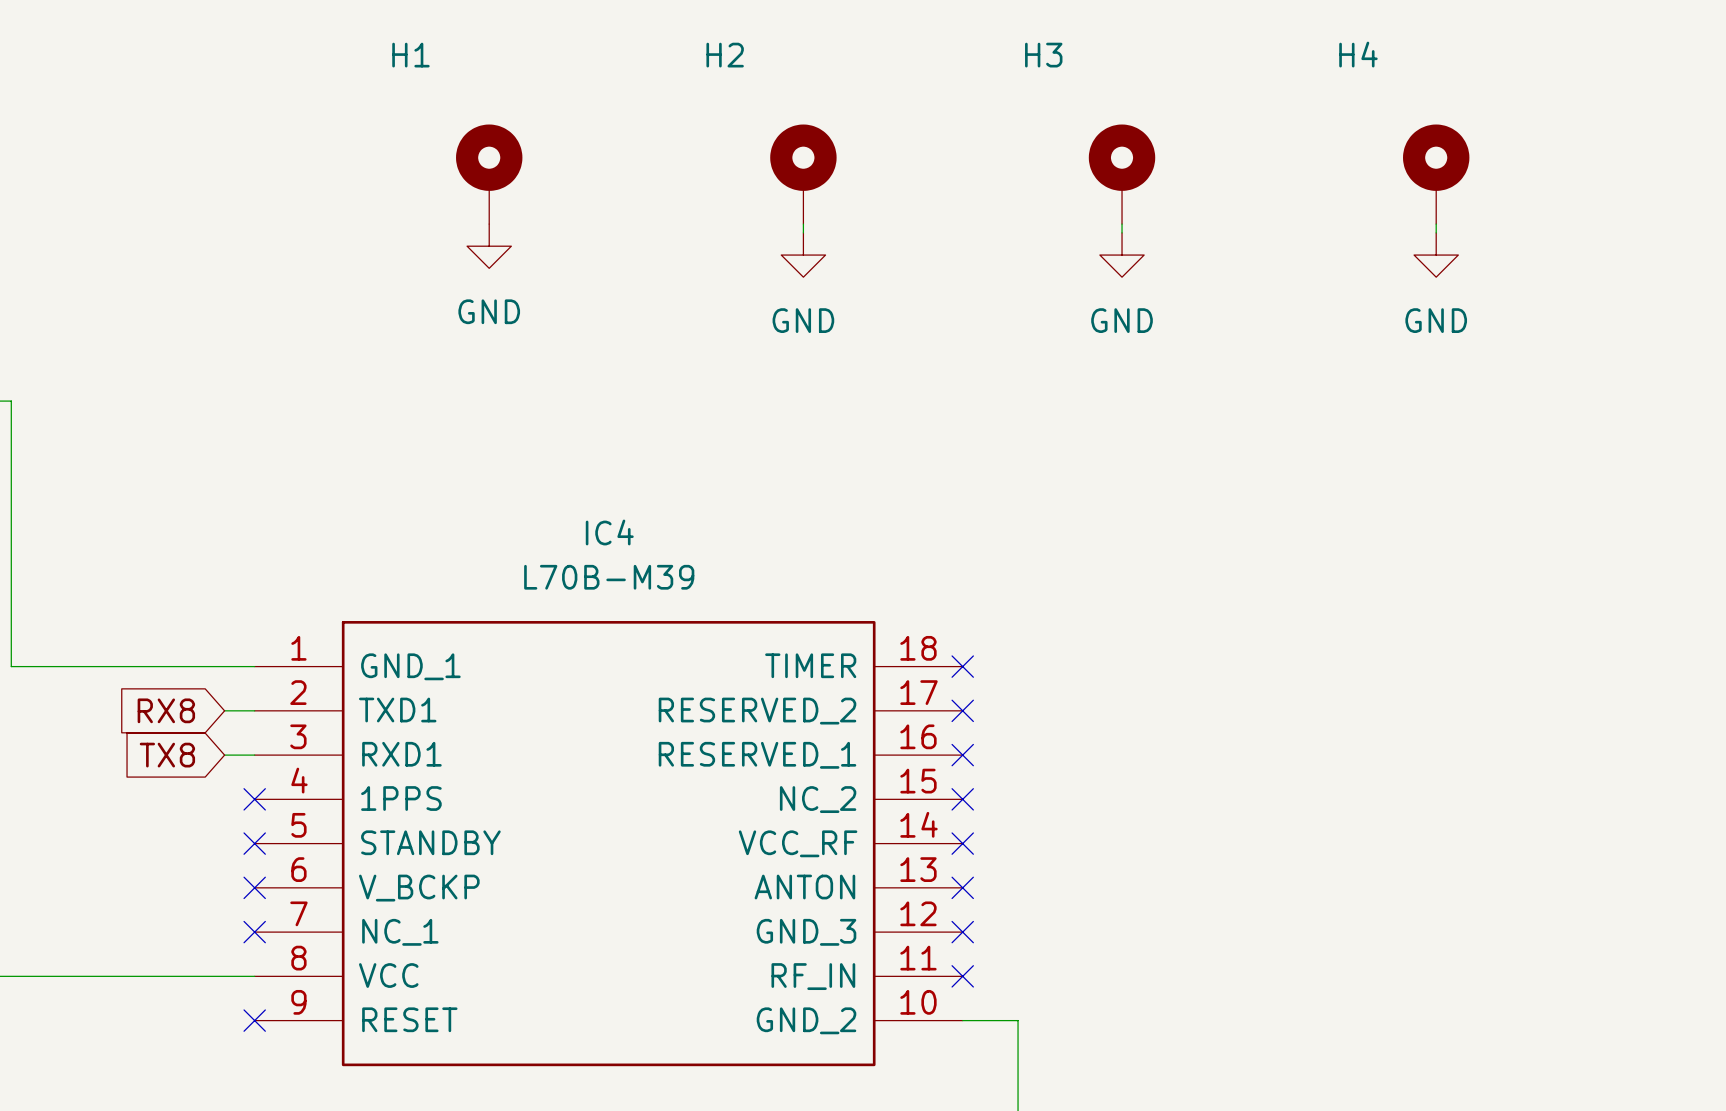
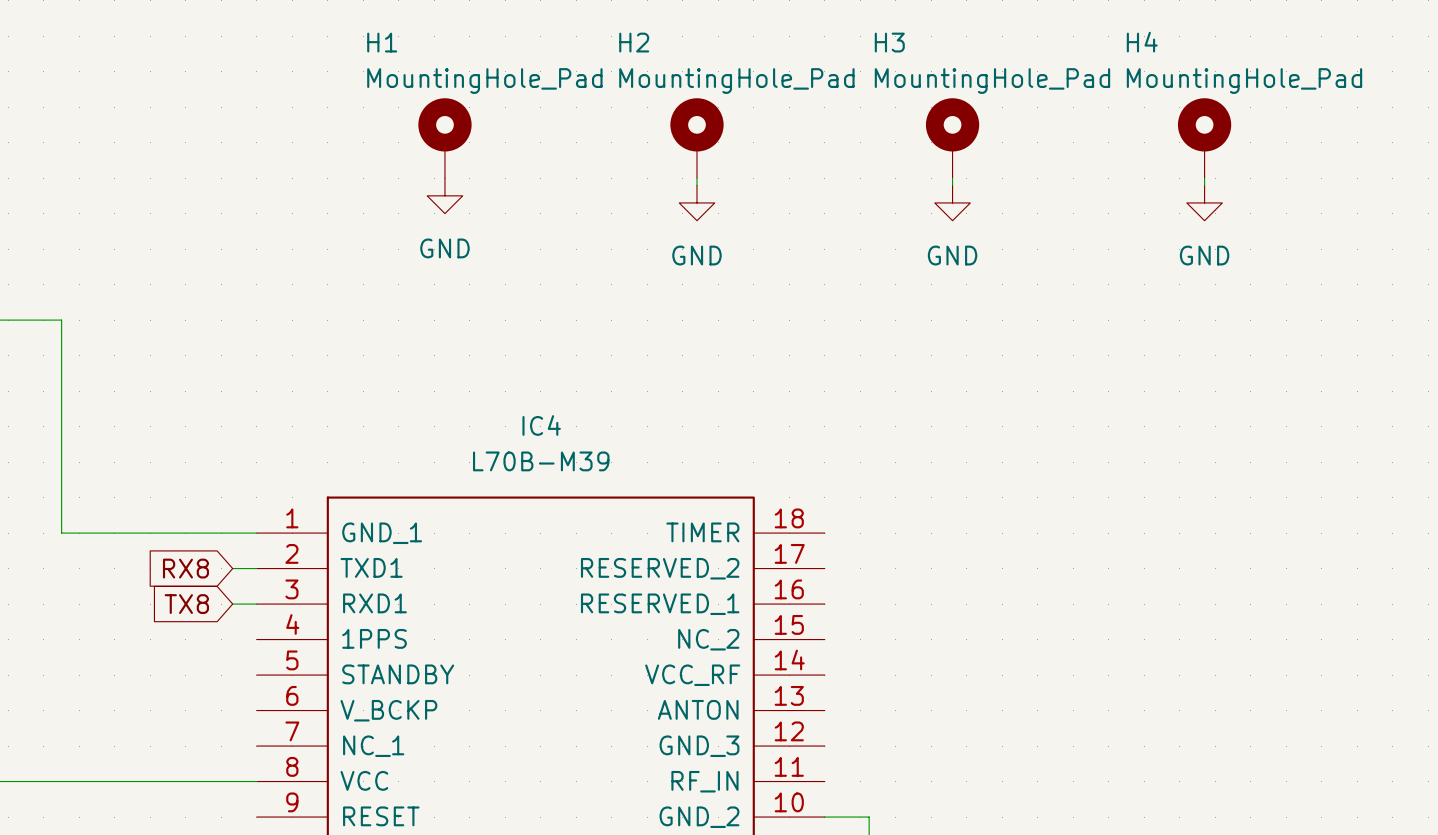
H1 value: none -> MountingHole_Pad (484, 81)
H2 value: none -> MountingHole_Pad (736, 81)
H3 value: none -> MountingHole_Pad (992, 81)
H4 value: none -> MountingHole_Pad (1244, 81)
no-connect mark: (962, 666) -> none
no-connect mark: (962, 710) -> none
no-connect mark: (962, 755) -> none
no-connect mark: (254, 799) -> none
no-connect mark: (962, 799) -> none
no-connect mark: (254, 843) -> none
no-connect mark: (962, 843) -> none
no-connect mark: (254, 887) -> none
no-connect mark: (962, 887) -> none
no-connect mark: (254, 932) -> none
no-connect mark: (962, 932) -> none
no-connect mark: (962, 976) -> none
no-connect mark: (254, 1020) -> none

